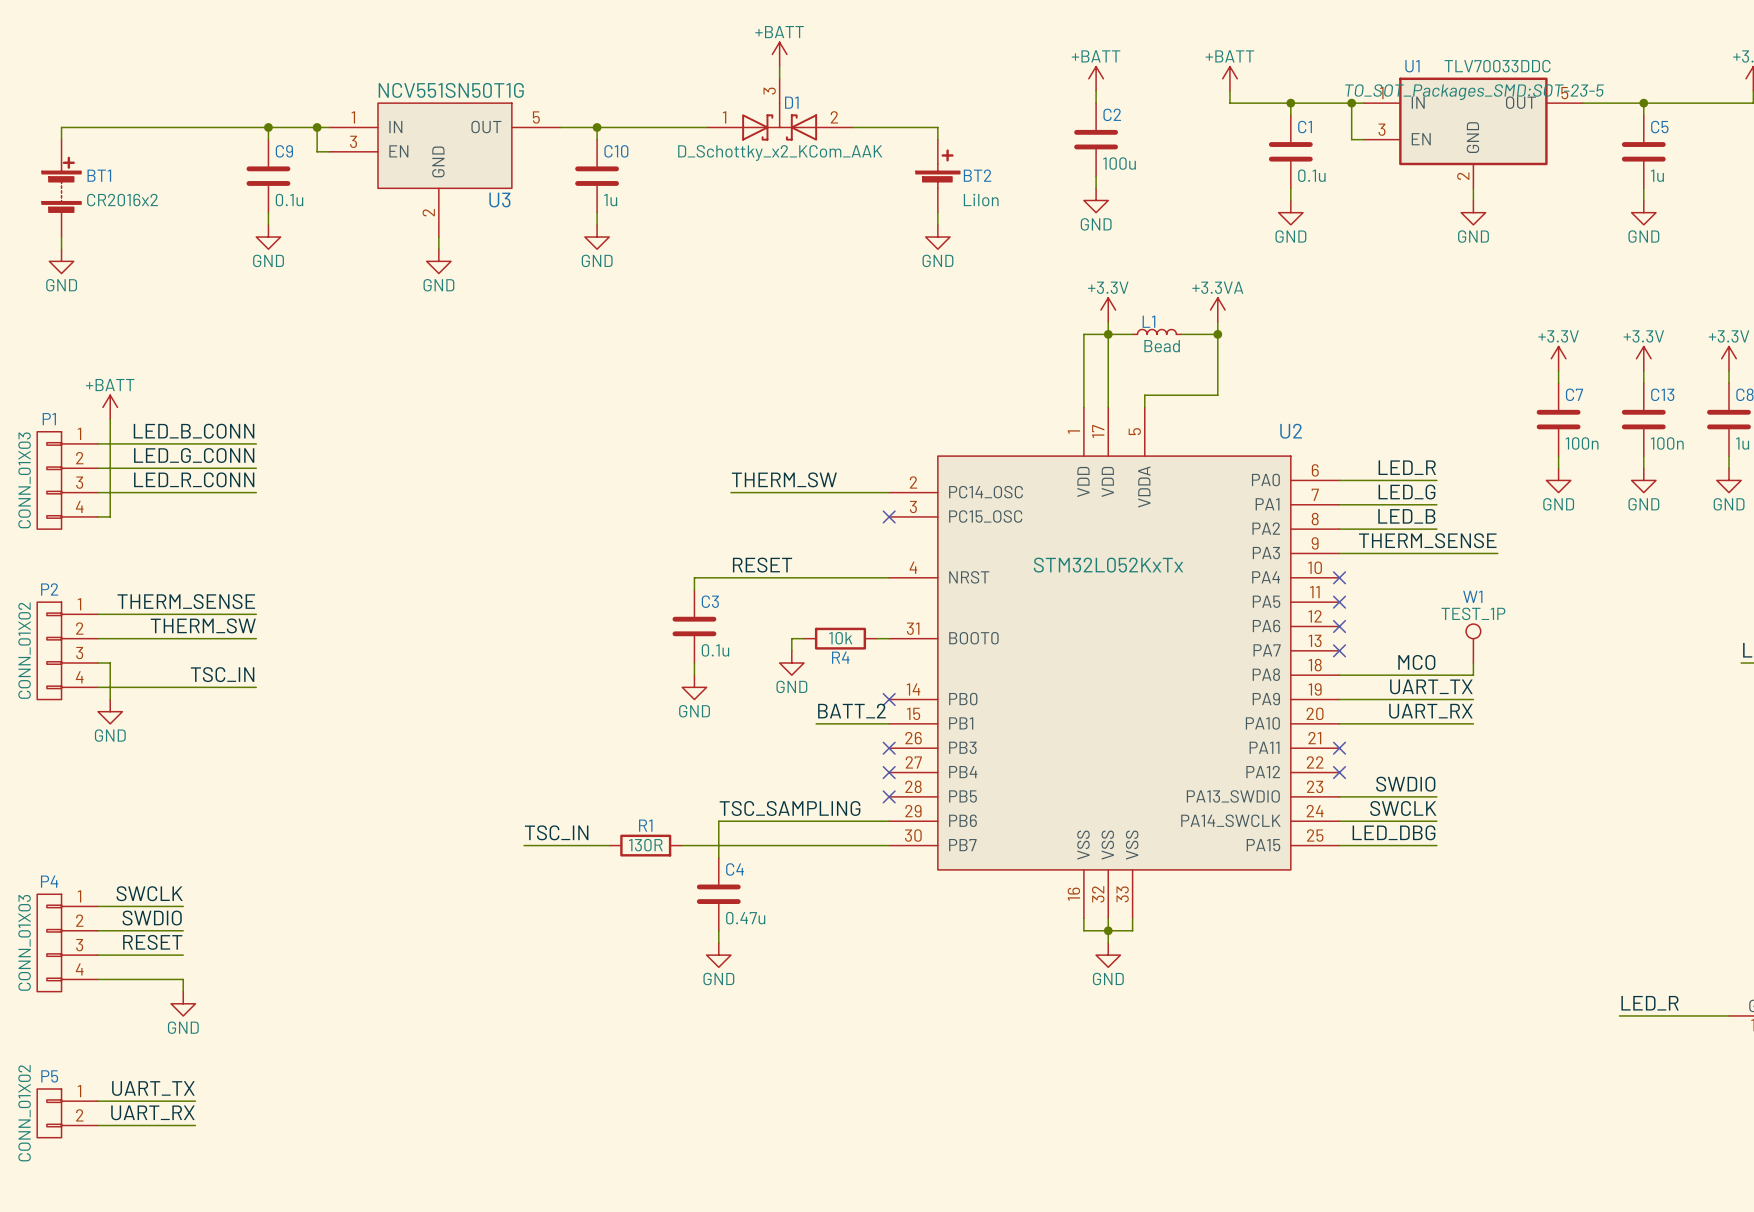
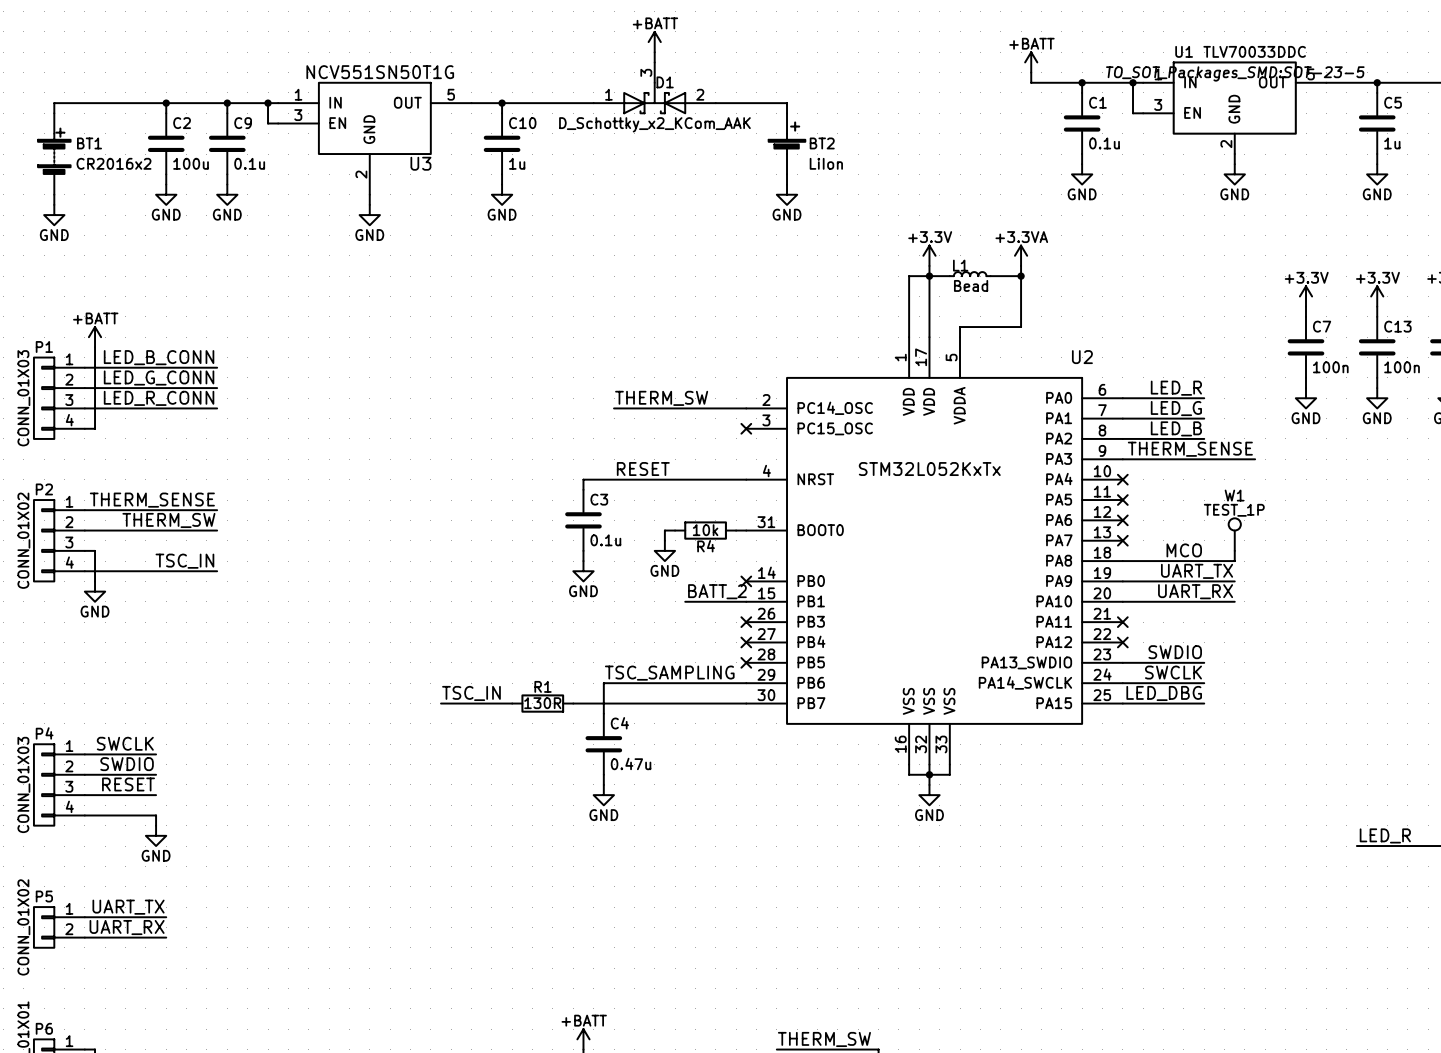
power symbol: +BATT (1096, 78) -> none
wire: (1096, 90) (1096, 103) -> none
wire: none -> (166, 103) (166, 113)
junction: none -> (166, 103)
C2 position: (1096, 139) -> (166, 143)
wire: (1096, 176) (1096, 188) -> none
power symbol: GND (1096, 200) -> none
wire: none -> (166, 174) (166, 184)
power symbol: none -> GND (166, 194)

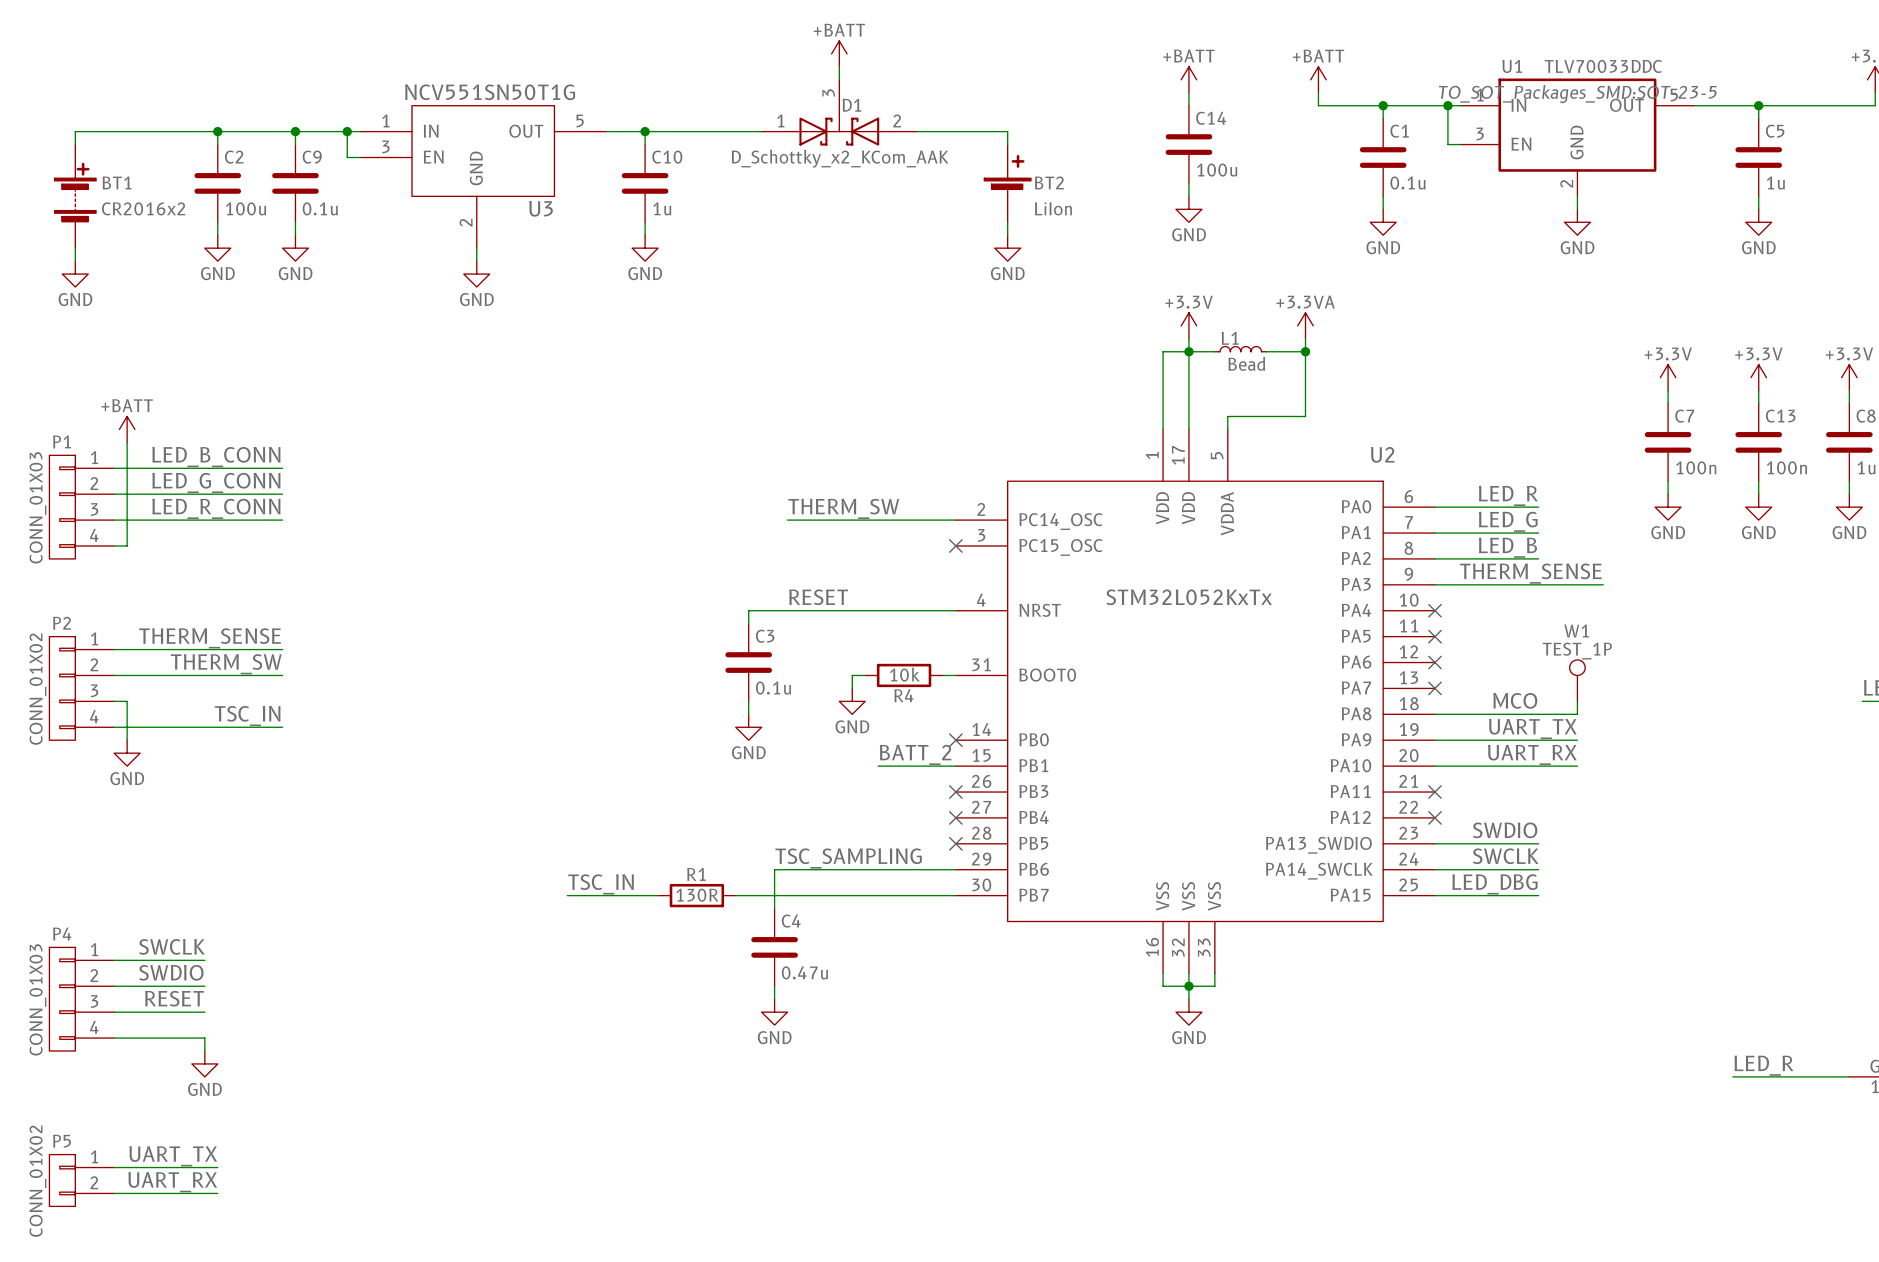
power symbol: none -> +BATT (1188, 79)
wire: none -> (1188, 92) (1188, 105)
C14: none -> 100u (1188, 144)
wire: none -> (1188, 183) (1188, 196)
power symbol: none -> GND (1188, 209)

